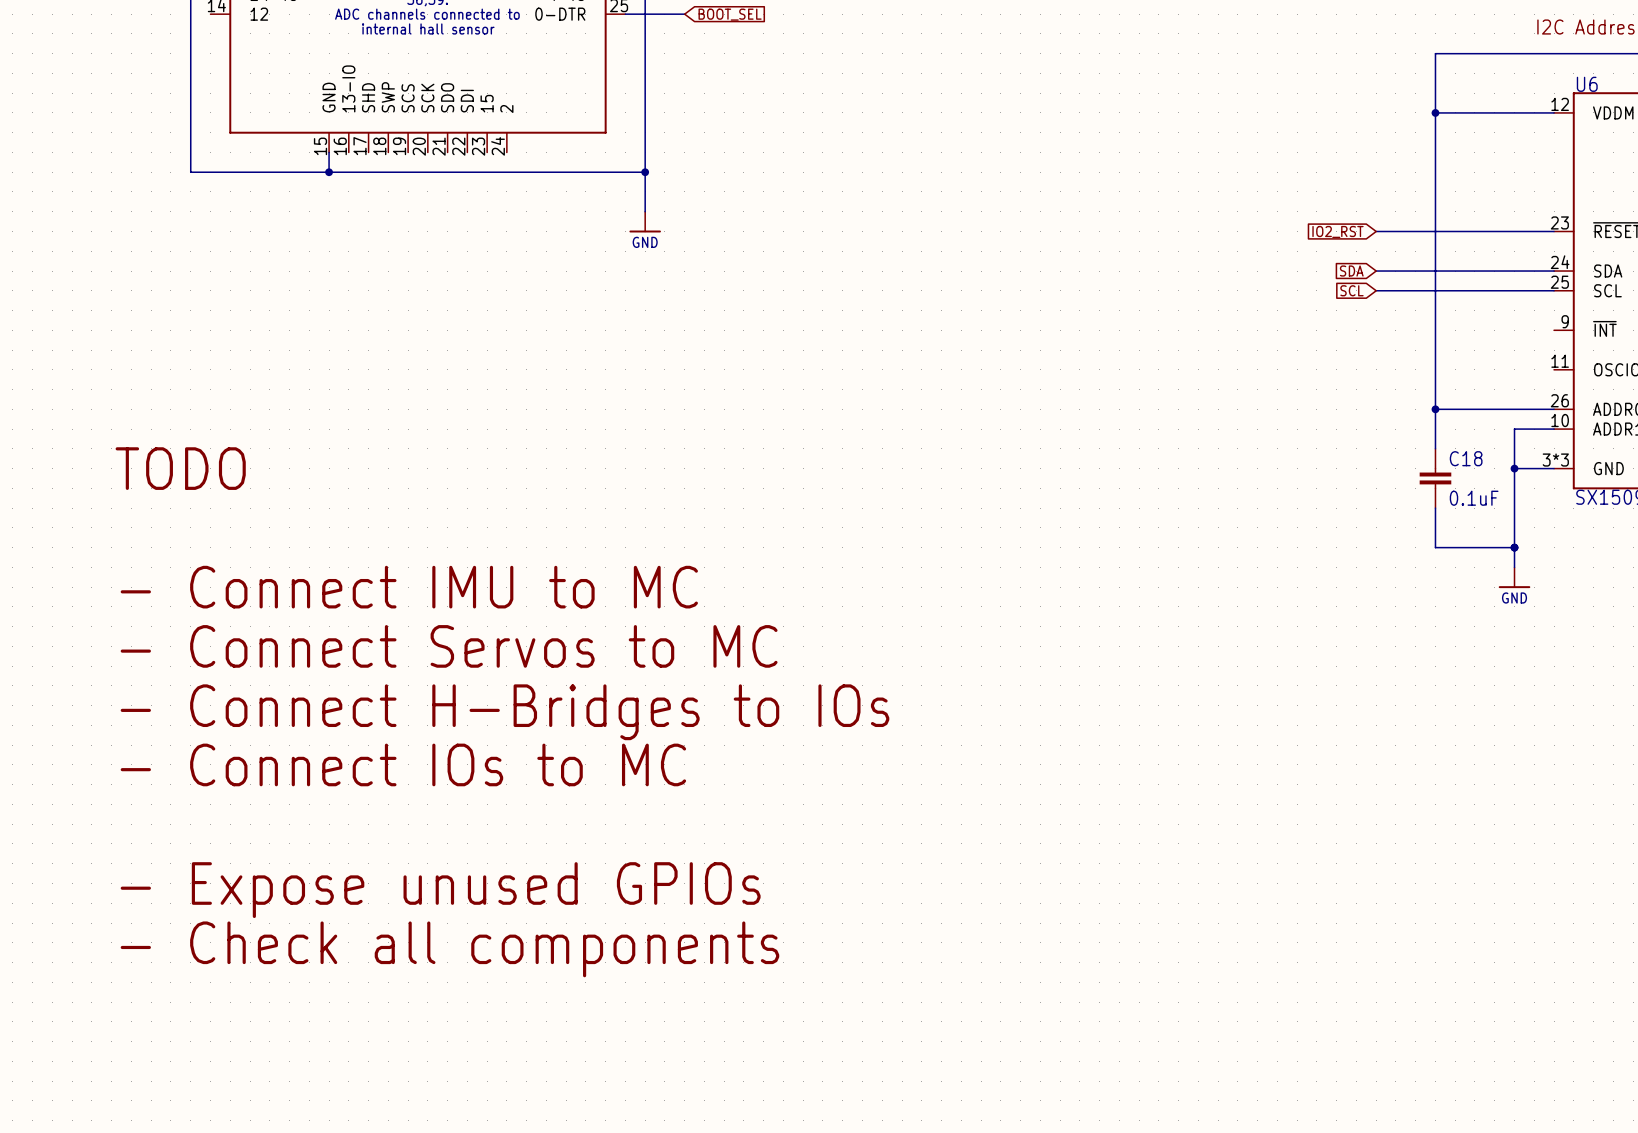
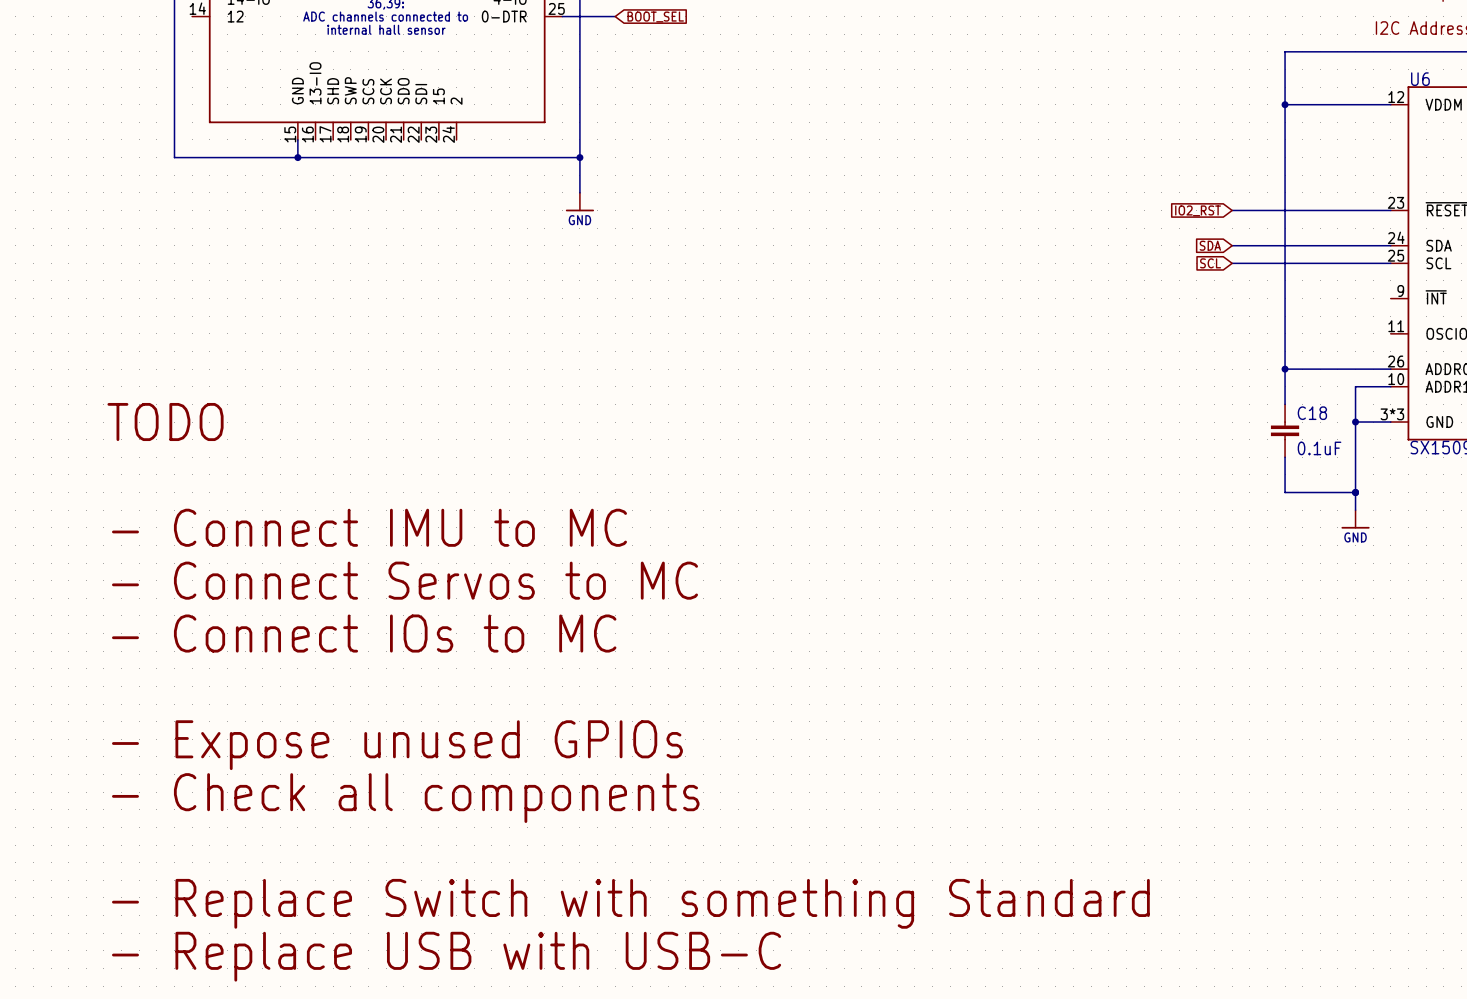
text: - Connect H-Bridges to IOs (505, 712) -> - Connect IOs to MC (364, 633)
text: - Connect IOs to MC (403, 764) -> none
text: none -> - Expose unused GPIOs (397, 745)
text: - Expose unused GPIOs (440, 890) -> - Check all components (405, 798)
text: - Check all components (449, 949) -> none
text: none -> - Replace Switch with something Standard (630, 903)
text: none -> - Replace USB with USB-C (446, 956)

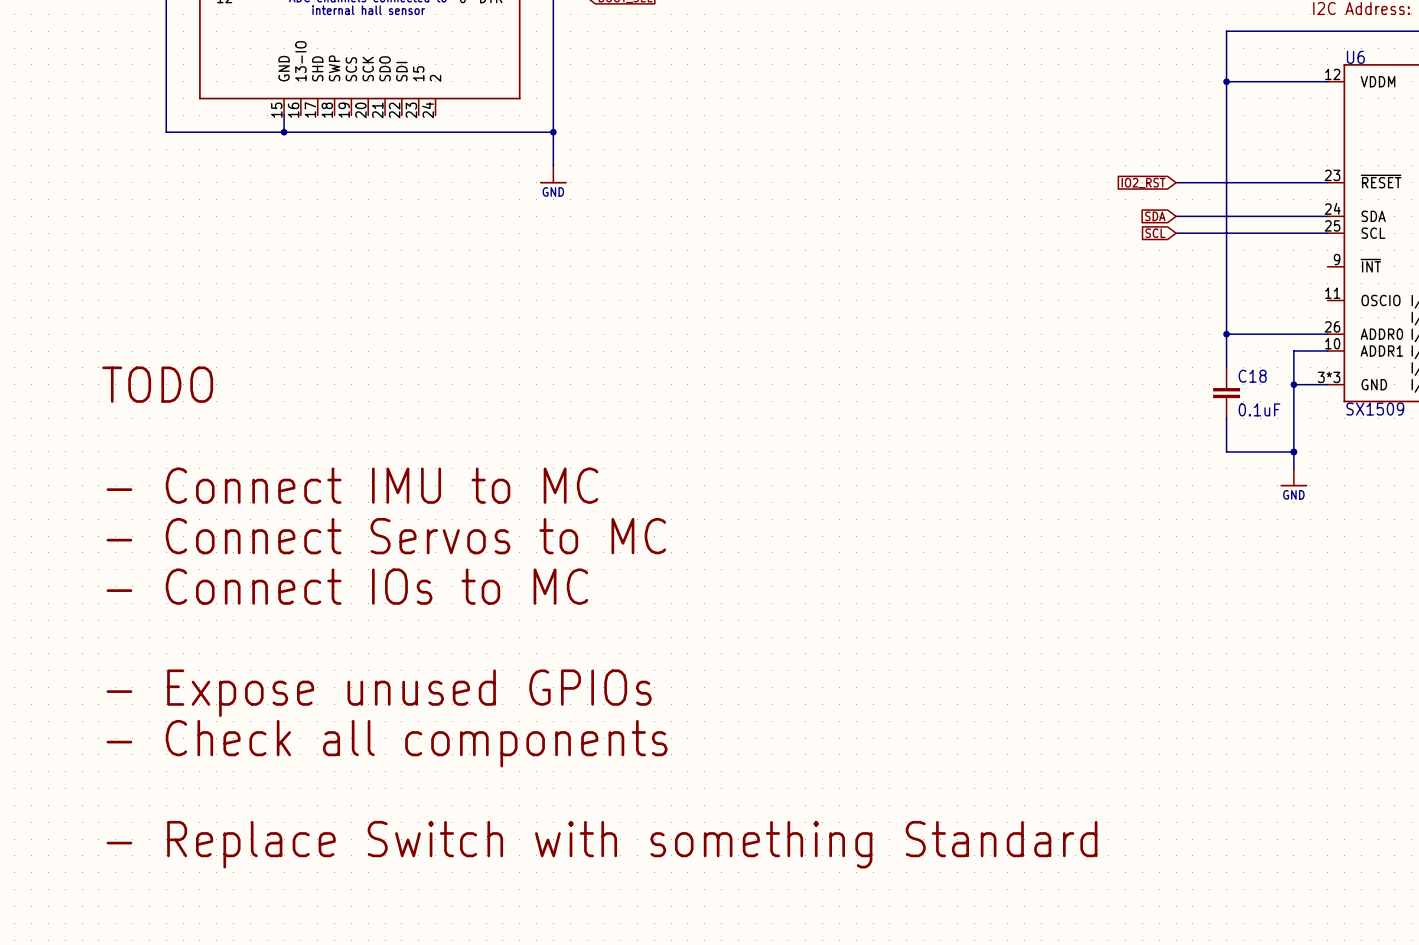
text: - Replace USB with USB-C (446, 956) -> none

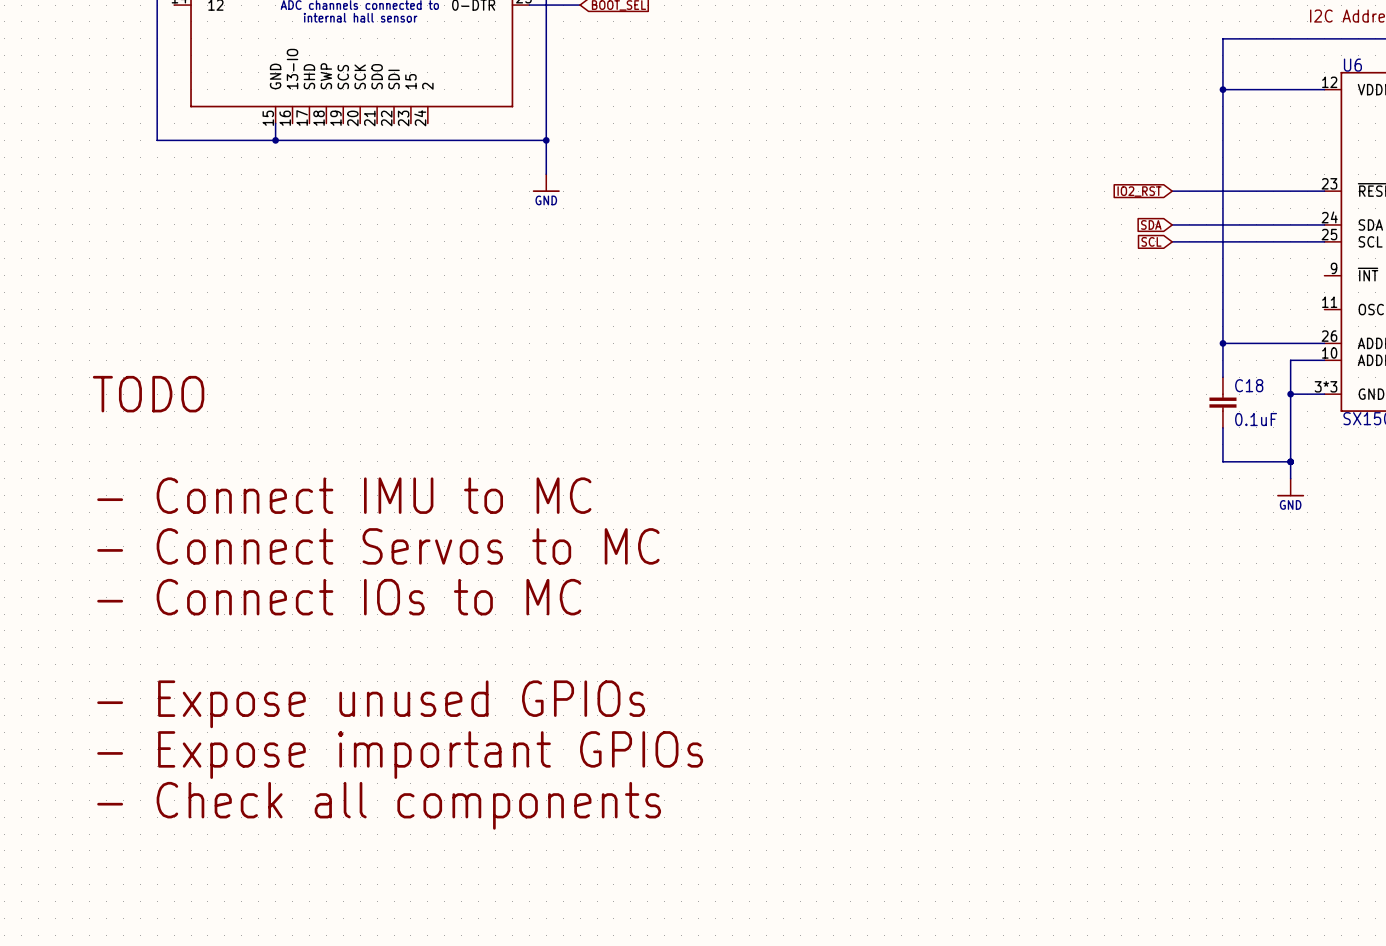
text: - Check all components (387, 743) -> - Expose important GPIOs (400, 755)
text: none -> - Check all components (379, 805)
text: - Replace Switch with something Standard (602, 844) -> none

